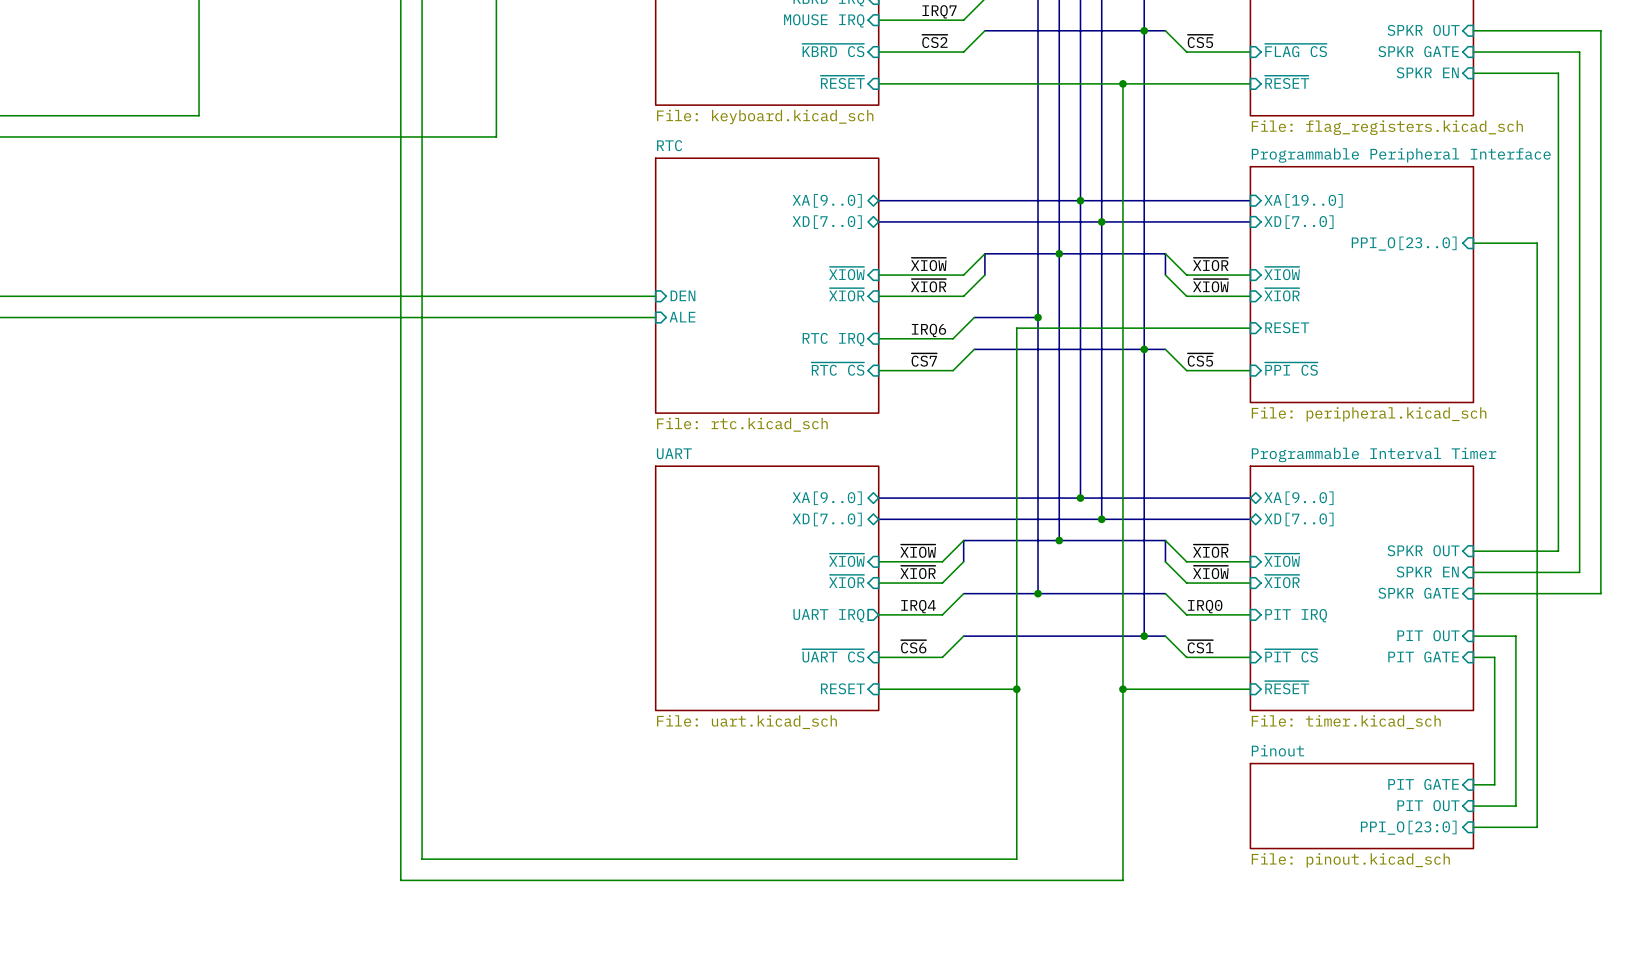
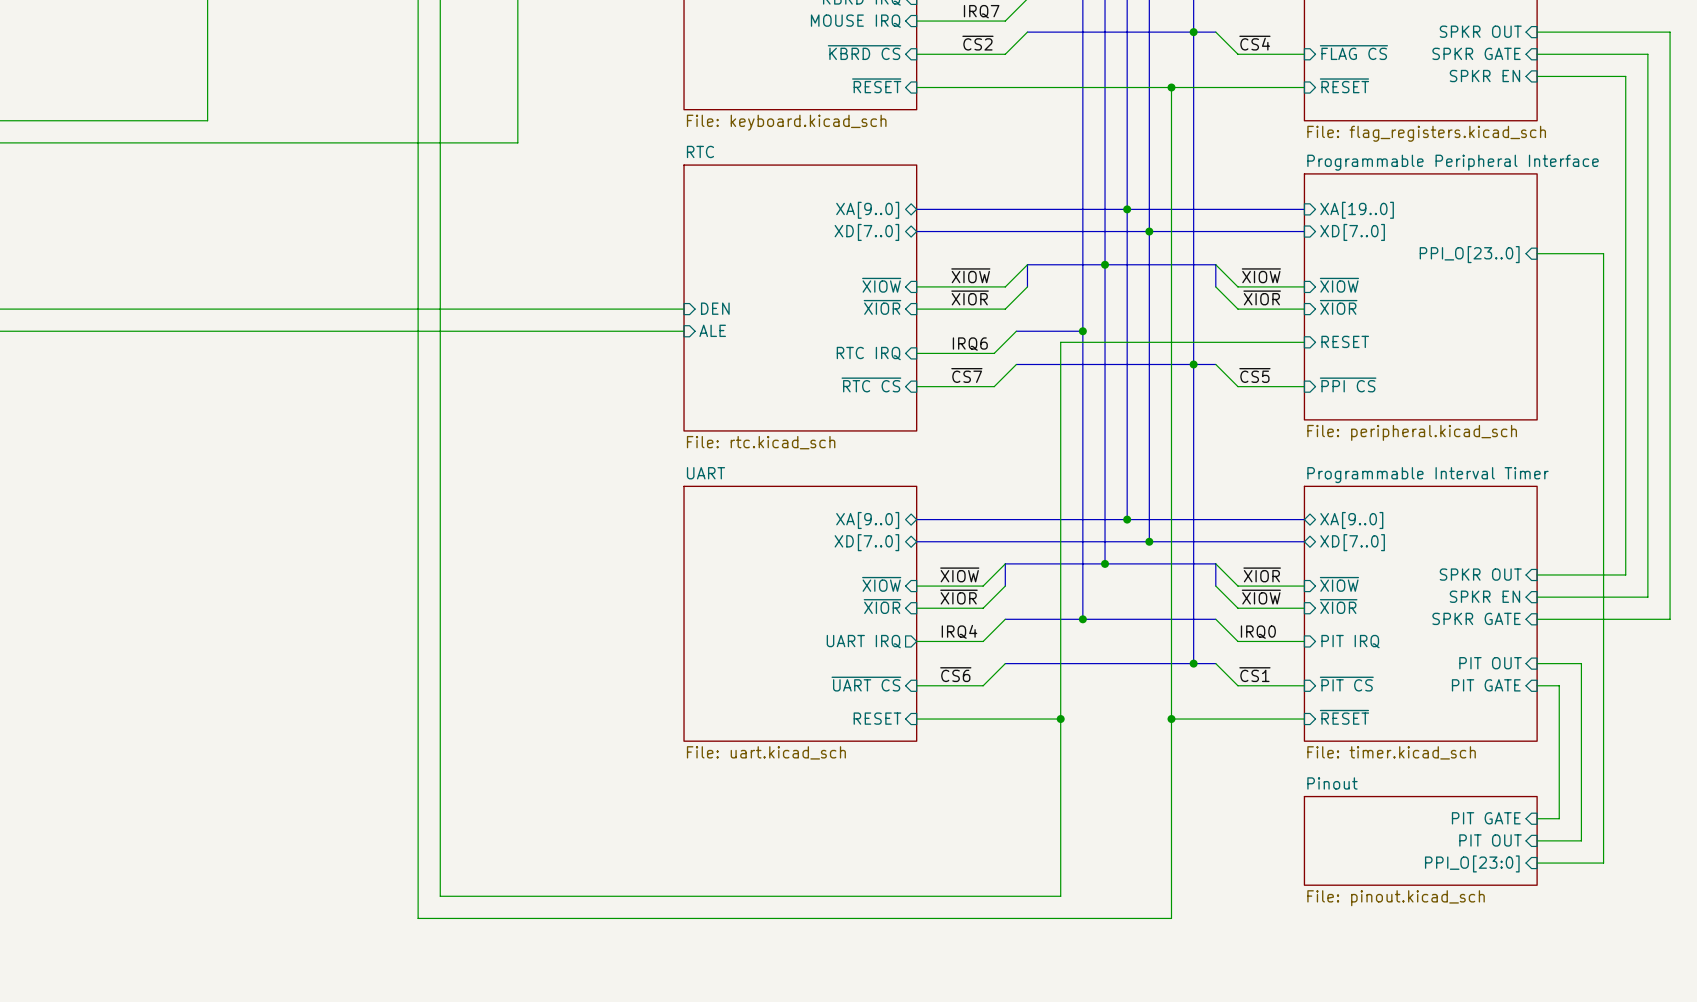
label: ~{CS5} (1200, 41) -> ~{CS4} (1254, 43)
label: ~{XIOR} (1210, 264) -> ~{XIOW} (1261, 275)
label: ~{XIOW} (1210, 285) -> ~{XIOR} (1262, 297)

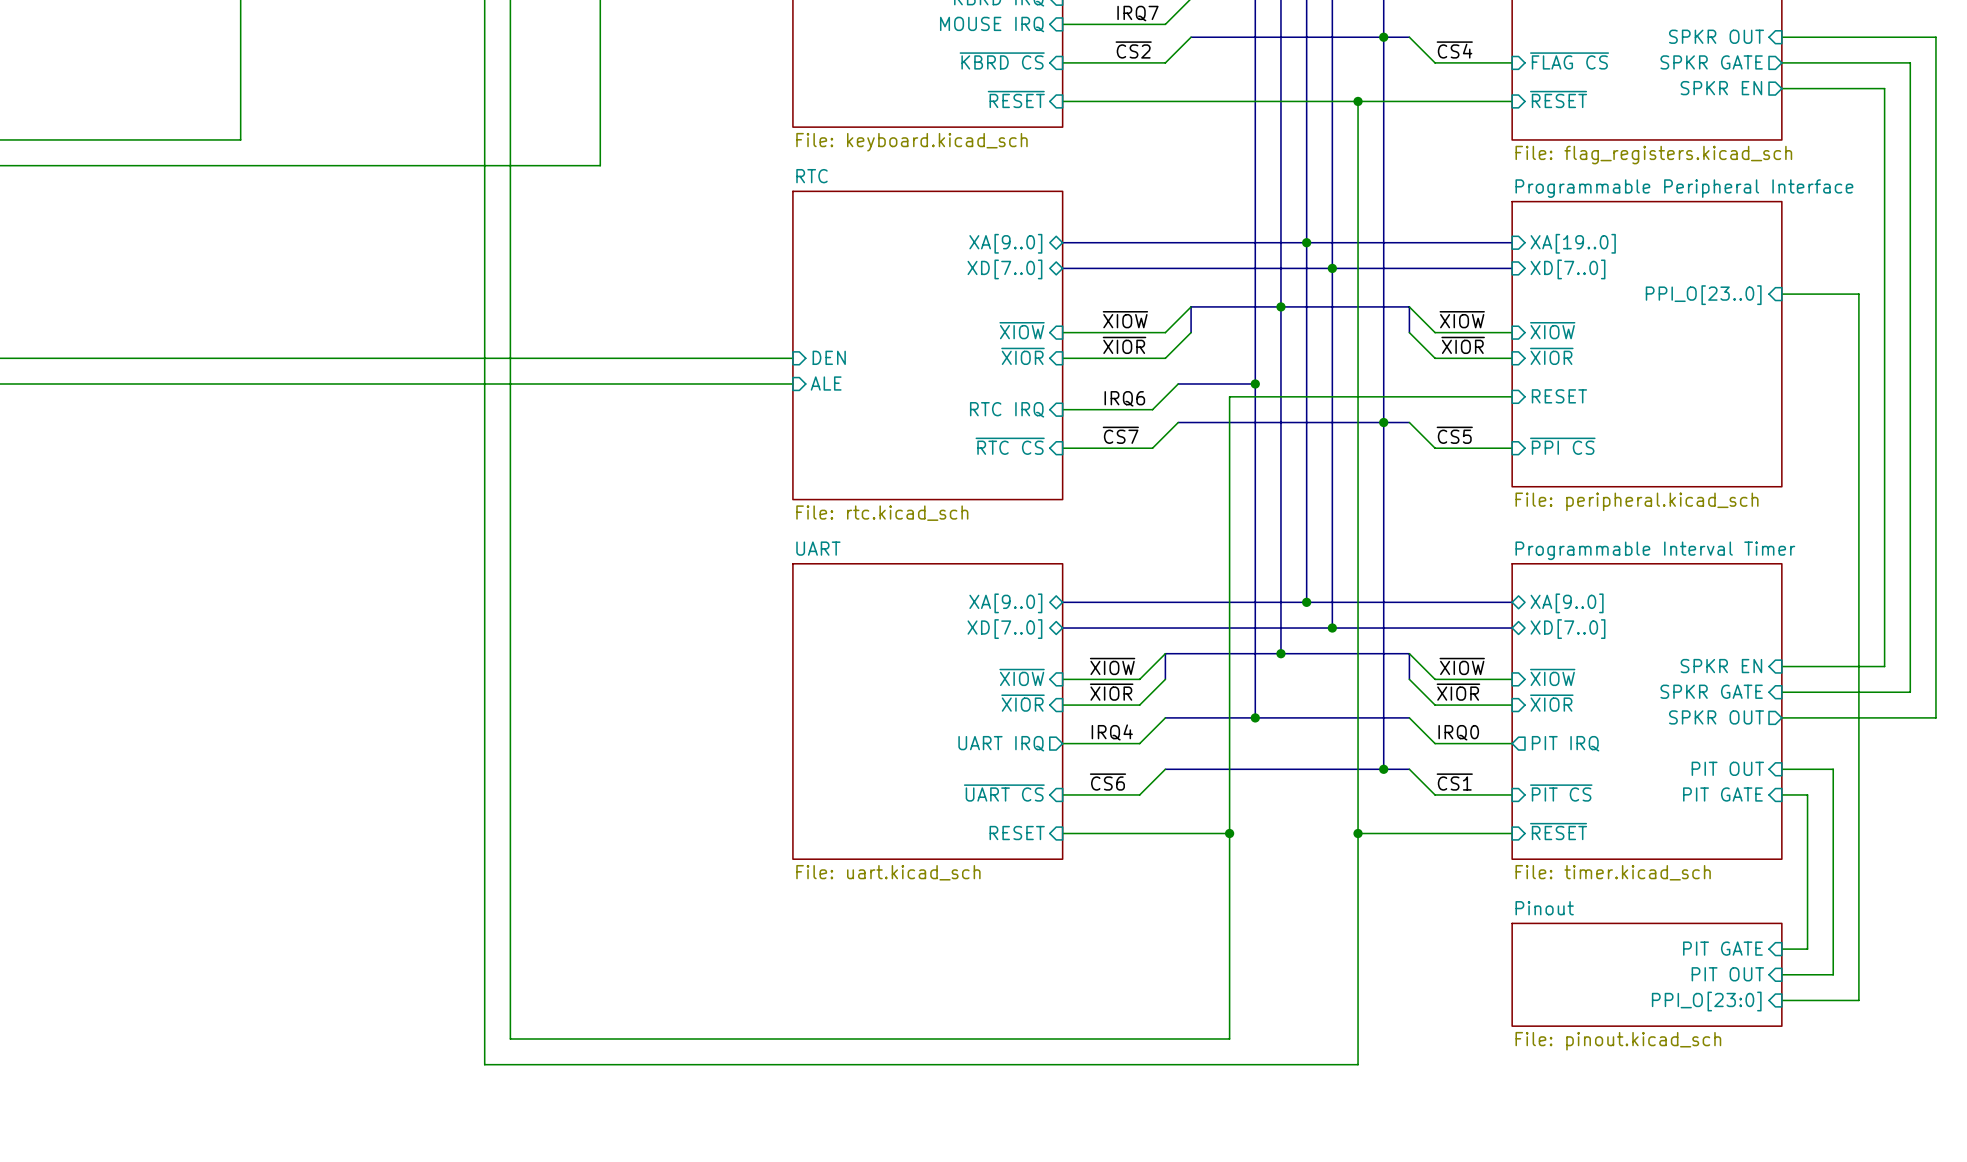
sheet pin shape: input (1476, 53) -> output (1711, 62)
sheet pin shape: input (1484, 76) -> output (1721, 88)
label: ~{XIOR} (1262, 574) -> ~{XIOW} (1462, 666)
sheet pin: SPKR OUT (1480, 574) -> SPKR EN (1721, 666)
sheet pin: SPKR EN (1484, 596) -> SPKR GATE (1711, 691)
label: ~{XIOW} (1261, 597) -> ~{XIOR} (1458, 692)
sheet pin shape: input (1476, 618) -> output (1716, 717)
sheet pin: SPKR GATE (1476, 618) -> SPKR OUT (1716, 717)
sheet pin shape: input (1350, 641) -> output (1565, 743)

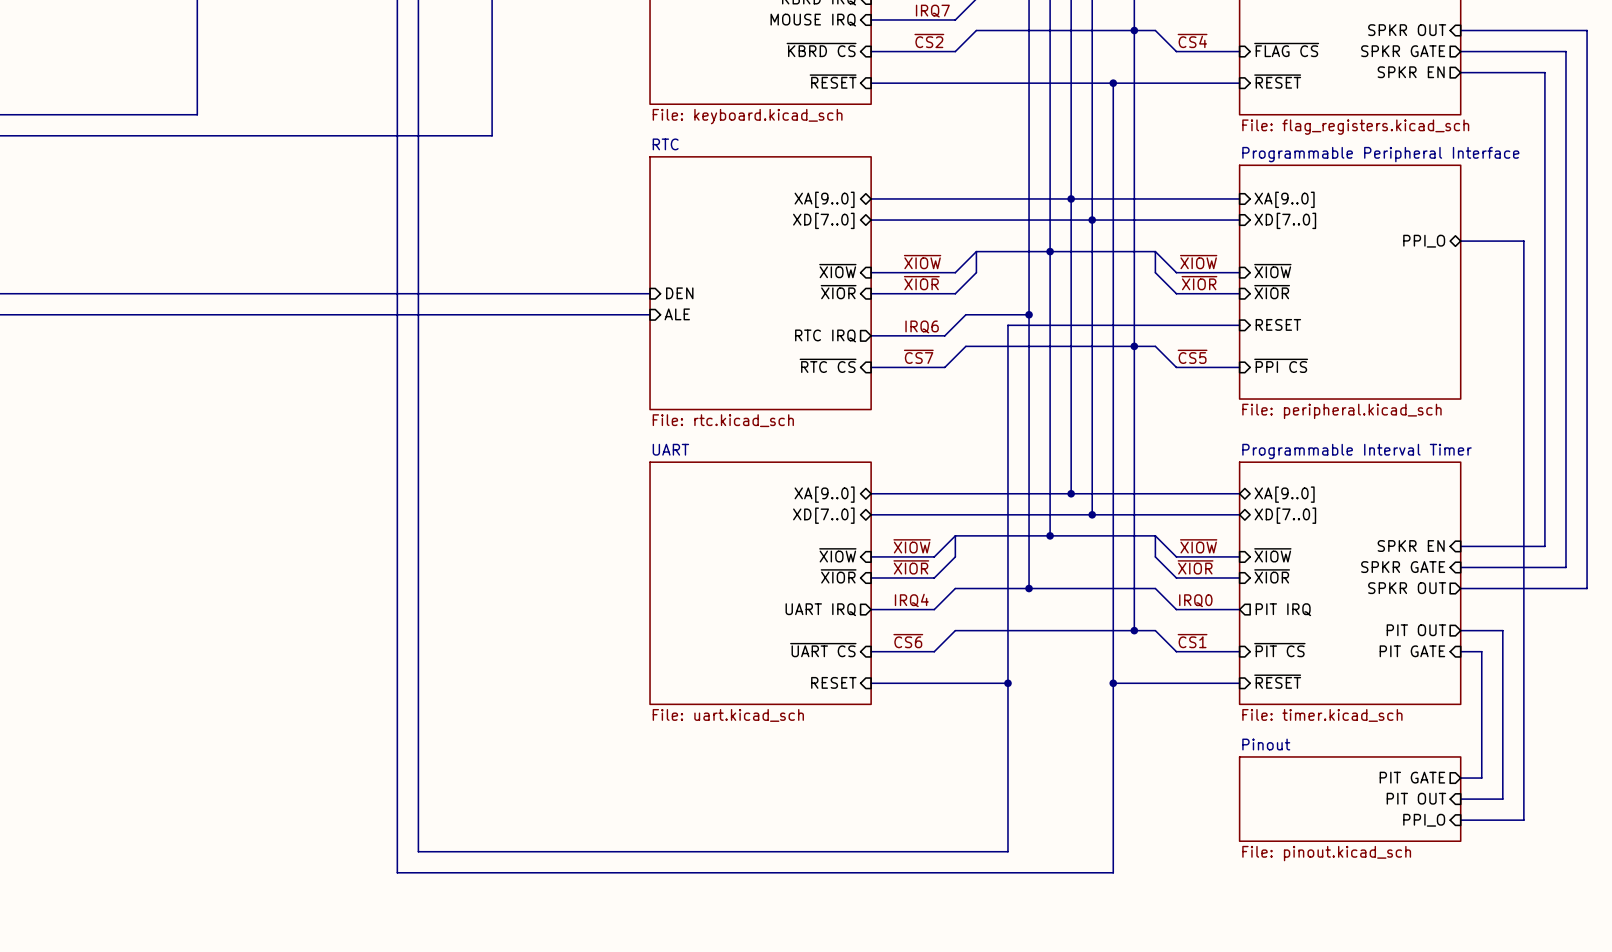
sheet pin: XA[19..0] (1573, 243) -> XA[9..0] (1284, 199)
bus: none -> (1460, 241) (1523, 241) (1523, 820) (1460, 820)
sheet pin shape: input (1703, 295) -> bidirectional (1424, 241)
sheet pin: PPI_O[23..0] (1703, 295) -> PPI_O (1424, 241)
sheet pin shape: input (1007, 409) -> output (825, 335)
sheet pin shape: input (1727, 768) -> output (1416, 630)
sheet pin shape: input (1722, 948) -> output (1412, 777)
sheet pin: PPI_O[23:0] (1706, 1001) -> PPI_O (1424, 820)

